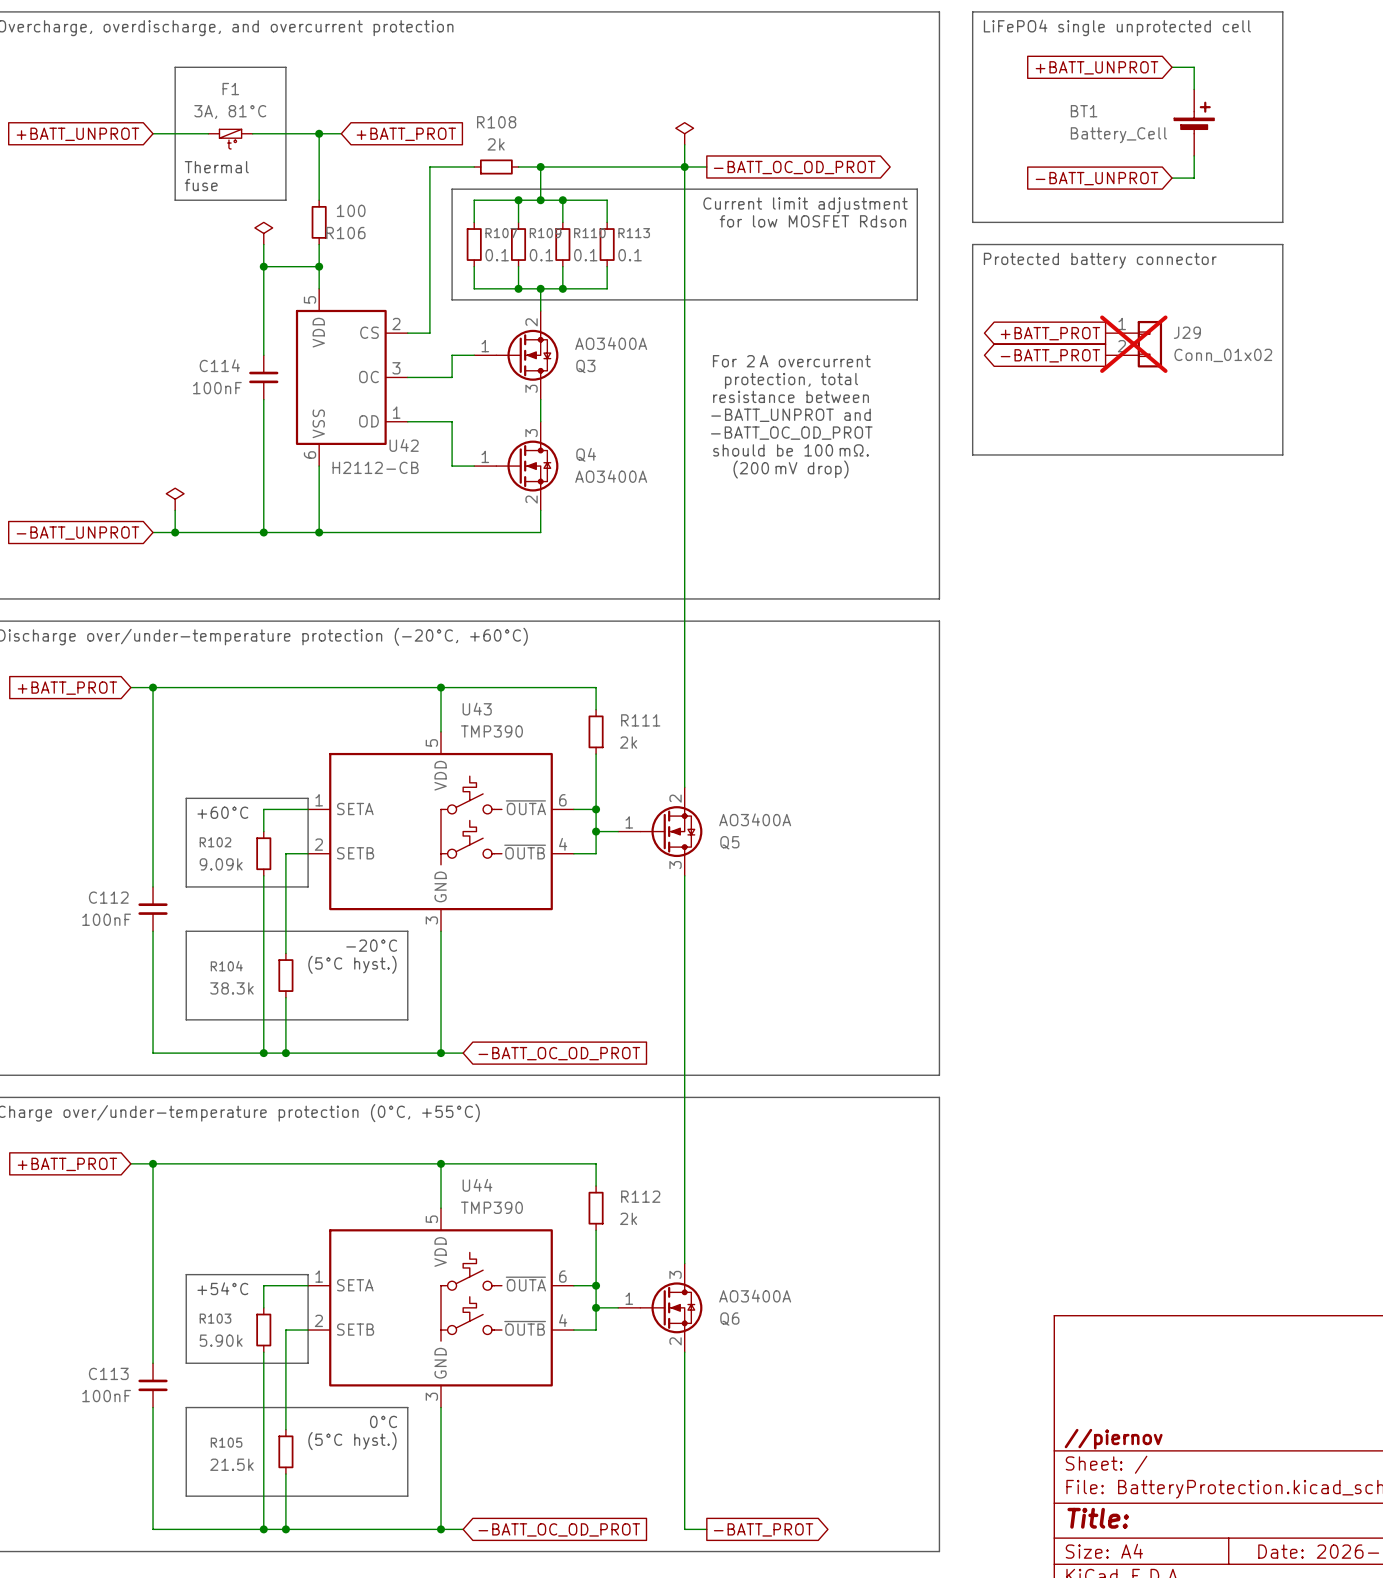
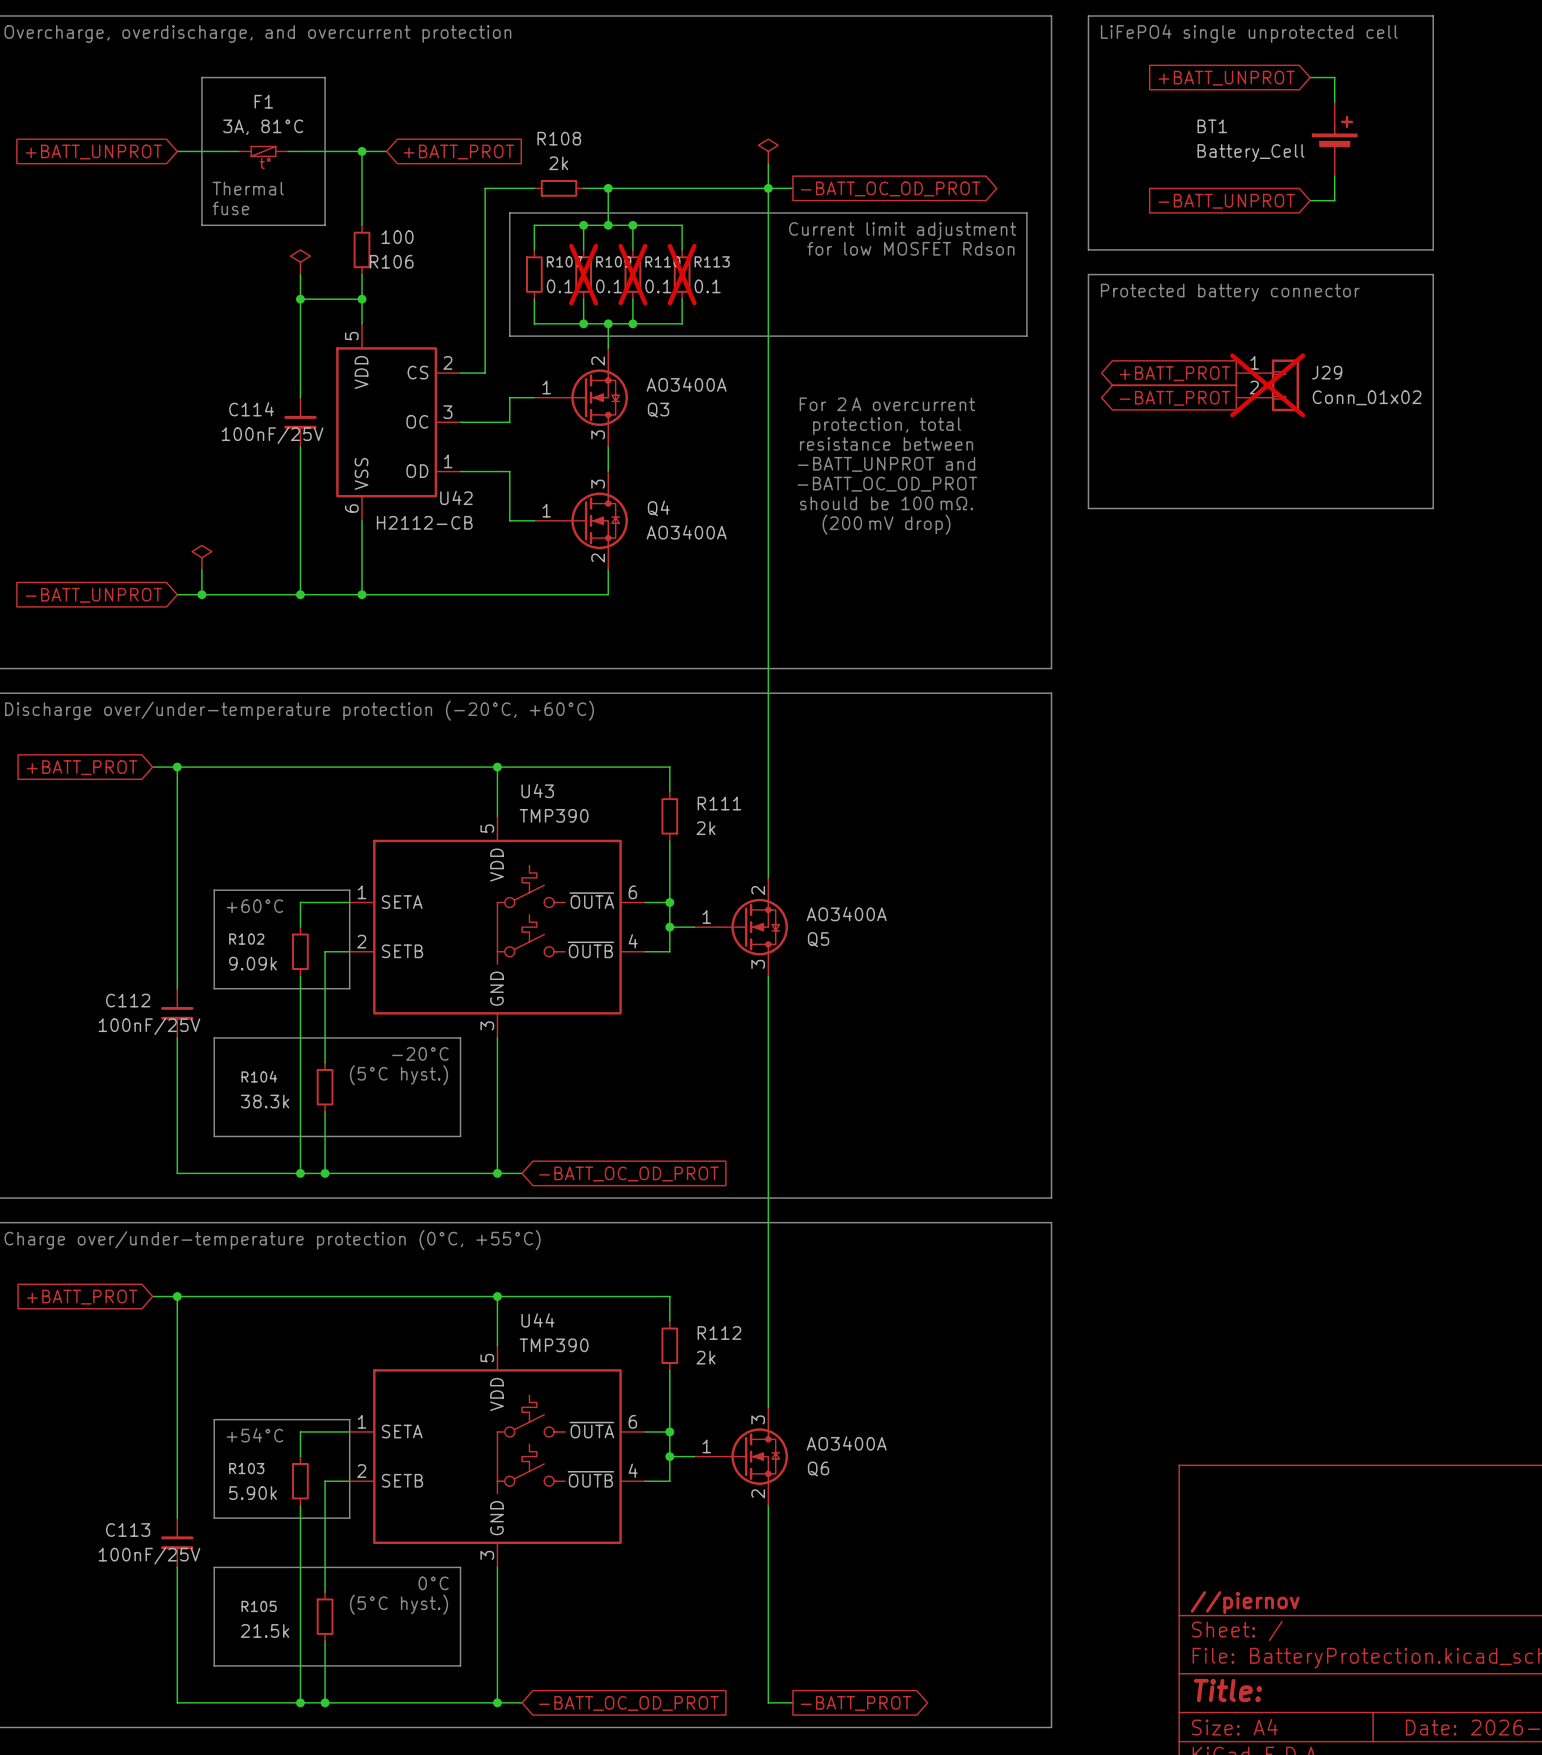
R109 do-not-place cross: none -> (583, 274)
R110 do-not-place cross: none -> (632, 274)
R113 do-not-place cross: none -> (682, 274)
C114 value: 100nF (217, 388) -> 100nF/25V (272, 435)
C112 value: 100nF (106, 919) -> 100nF/25V (149, 1026)
C113 value: 100nF (106, 1396) -> 100nF/25V (149, 1555)

